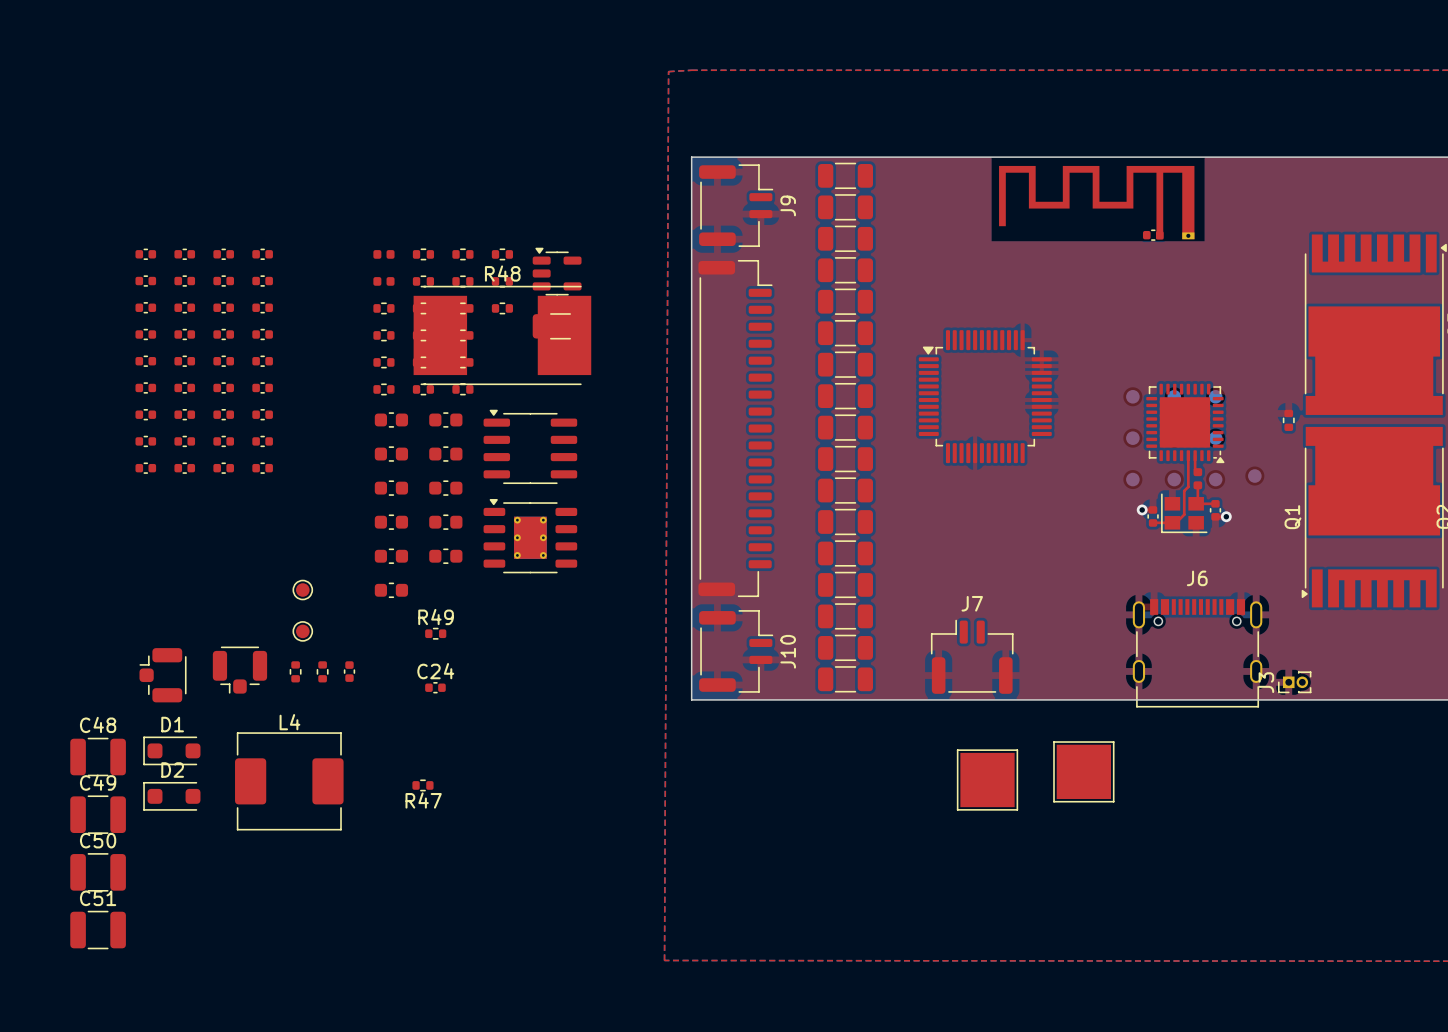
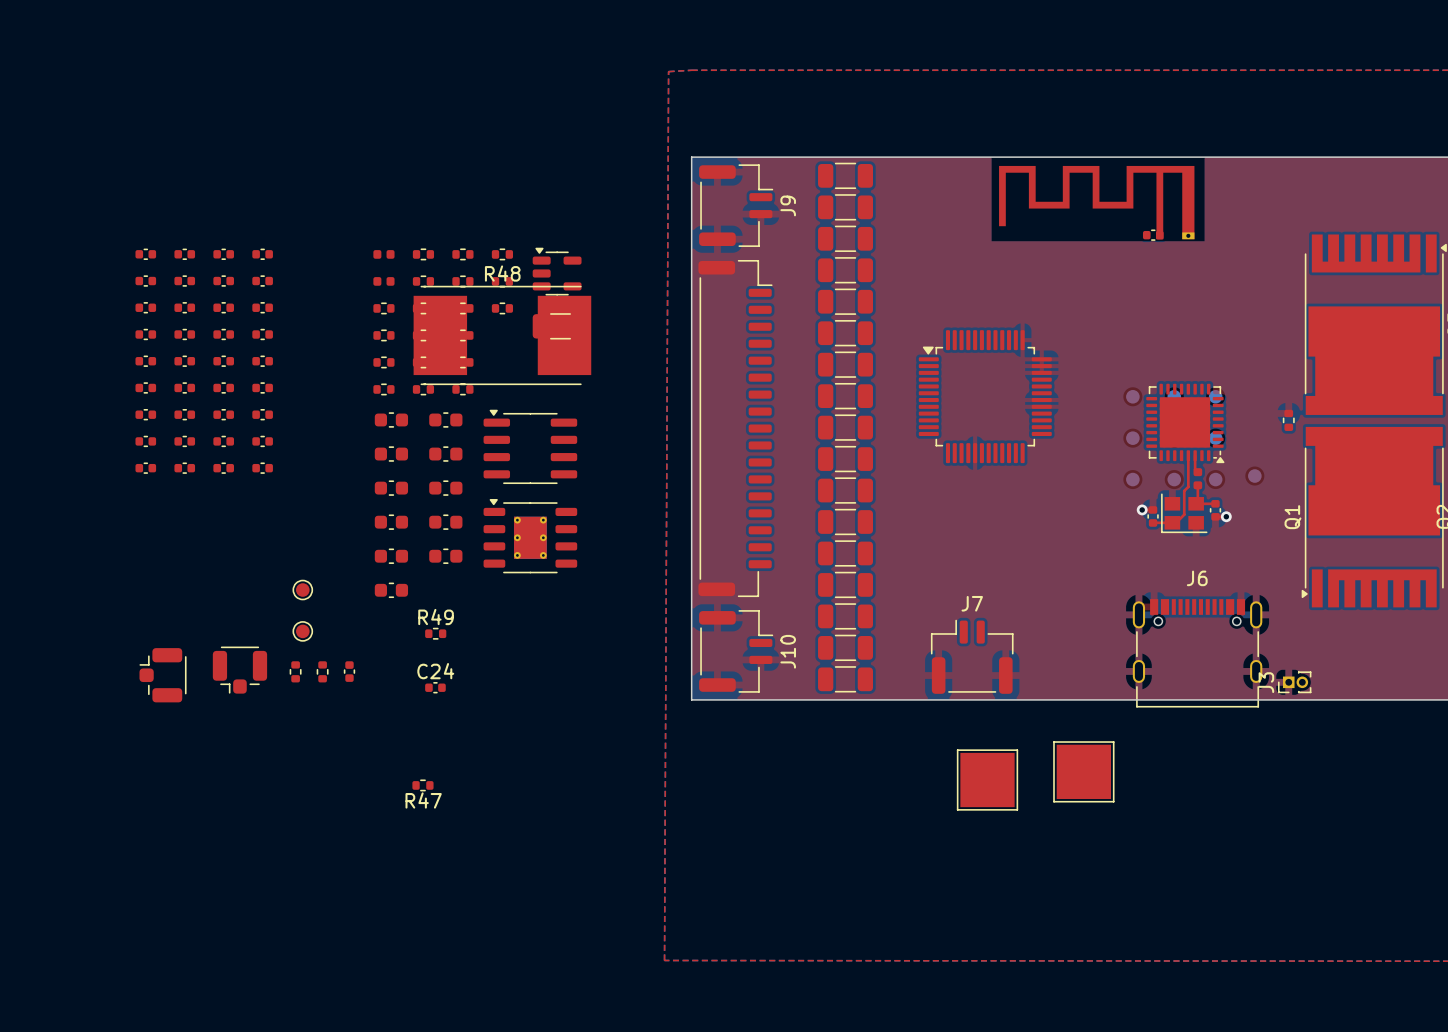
D1: (171, 750) -> none
C48: (98, 757) -> none
L4: (289, 781) -> none
D2: (171, 796) -> none
C49: (98, 814) -> none
C50: (98, 872) -> none
C51: (98, 930) -> none

